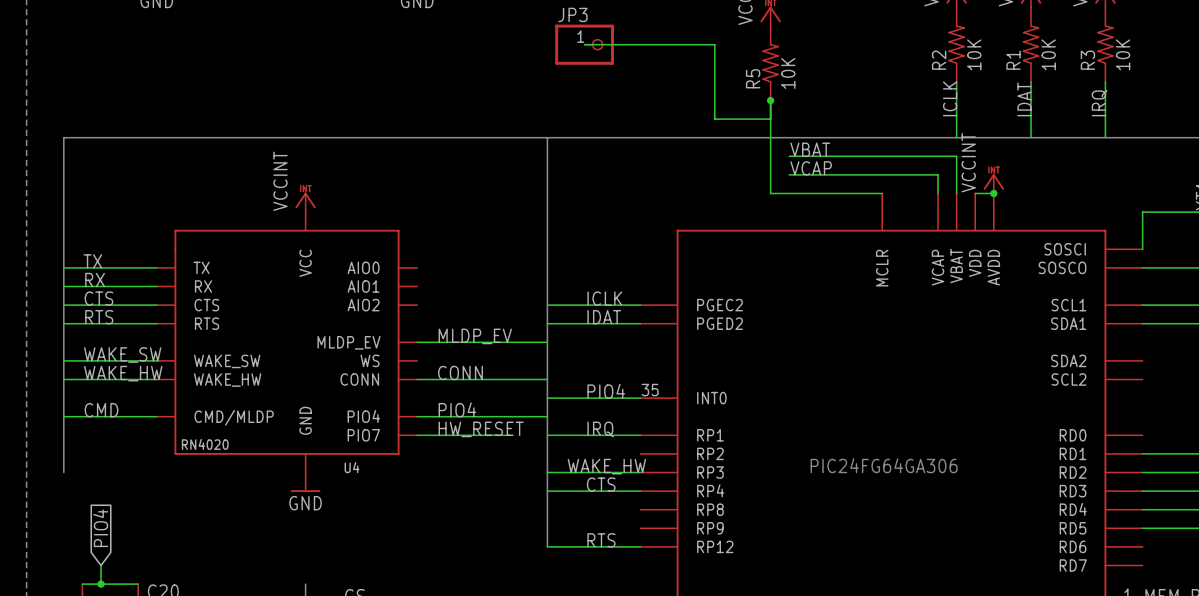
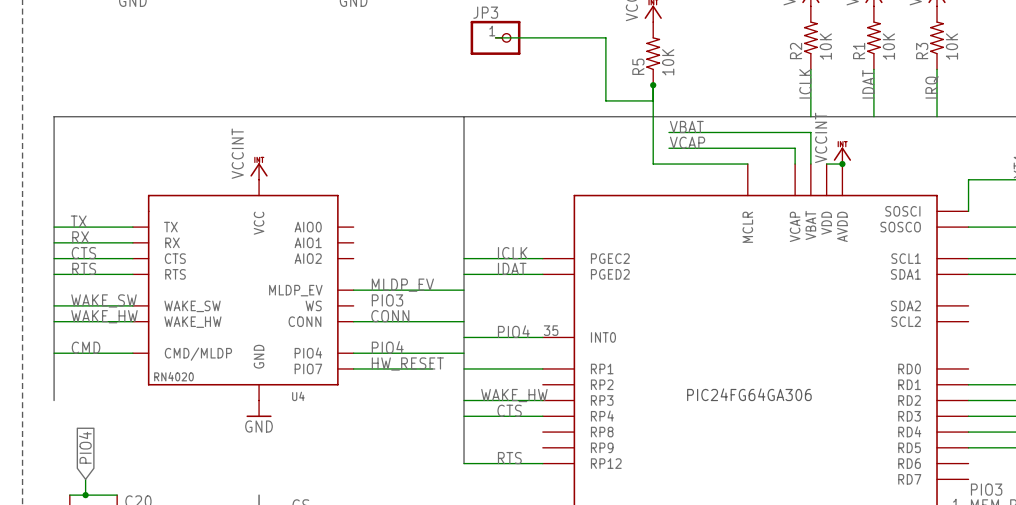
label: none -> PIO3 (387, 300)
label: IRQ (600, 429) -> none
label: none -> PIO3 (986, 489)

